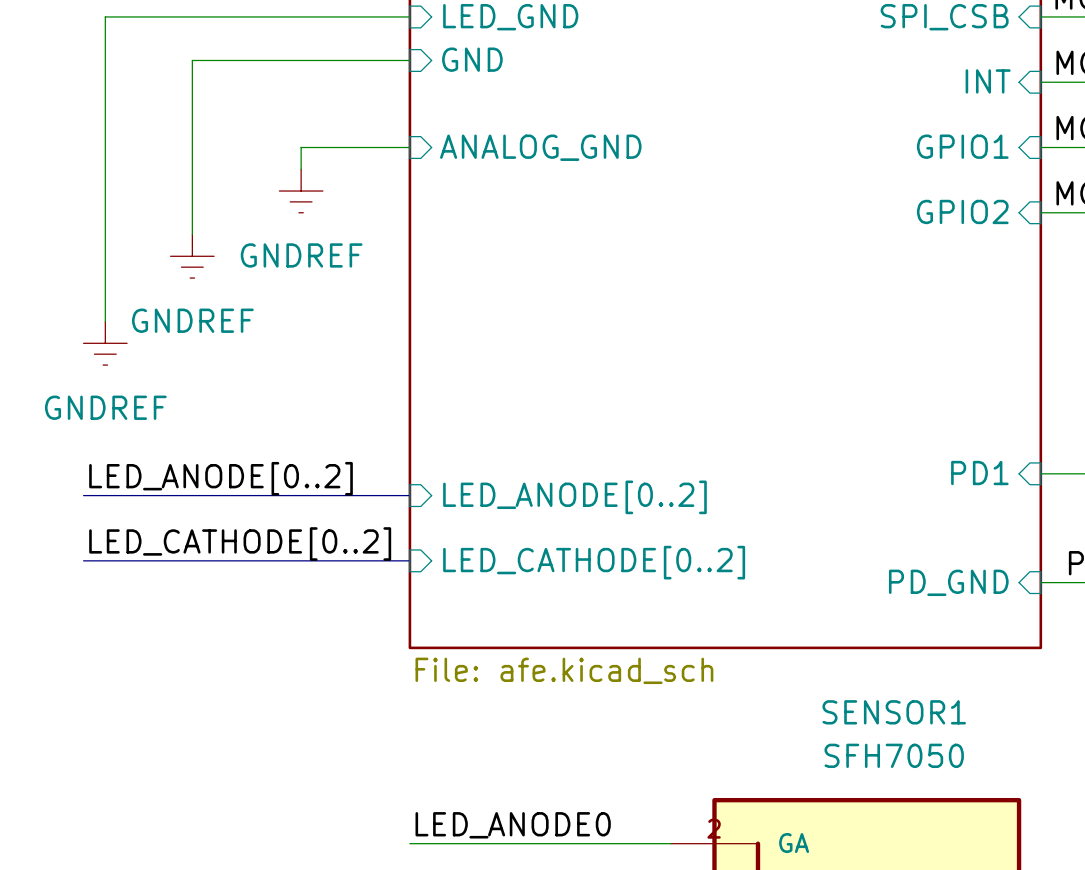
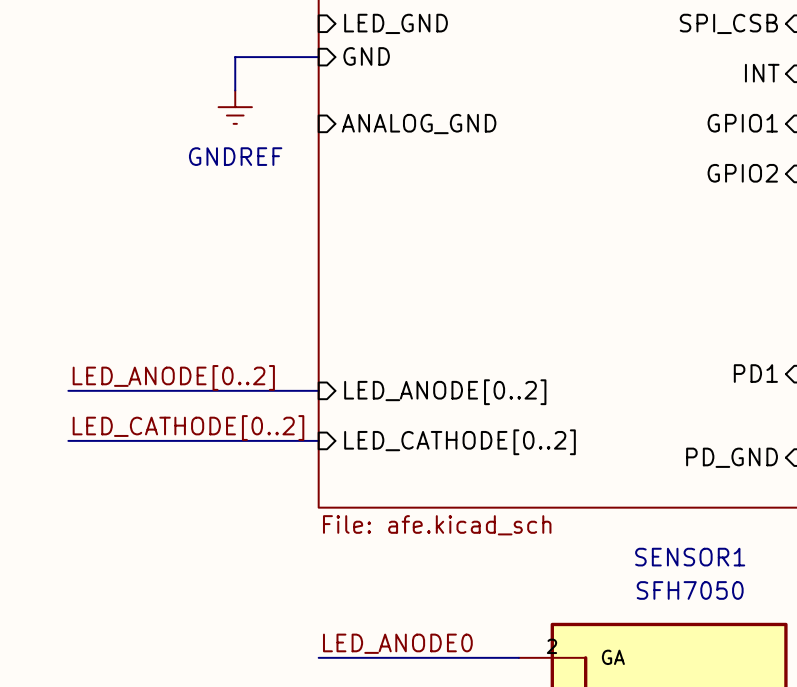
wire: (409, 16) (105, 16) (105, 321) -> none
wire: (301, 60) (192, 60) (192, 234) -> (235, 57) (235, 90)
wire: (409, 147) (301, 147) (301, 169) -> none
power symbol position: GNDREF (301, 191) -> GNDREF (235, 107)
power symbol: GNDREF (192, 256) -> none
power symbol: GNDREF (105, 343) -> none

